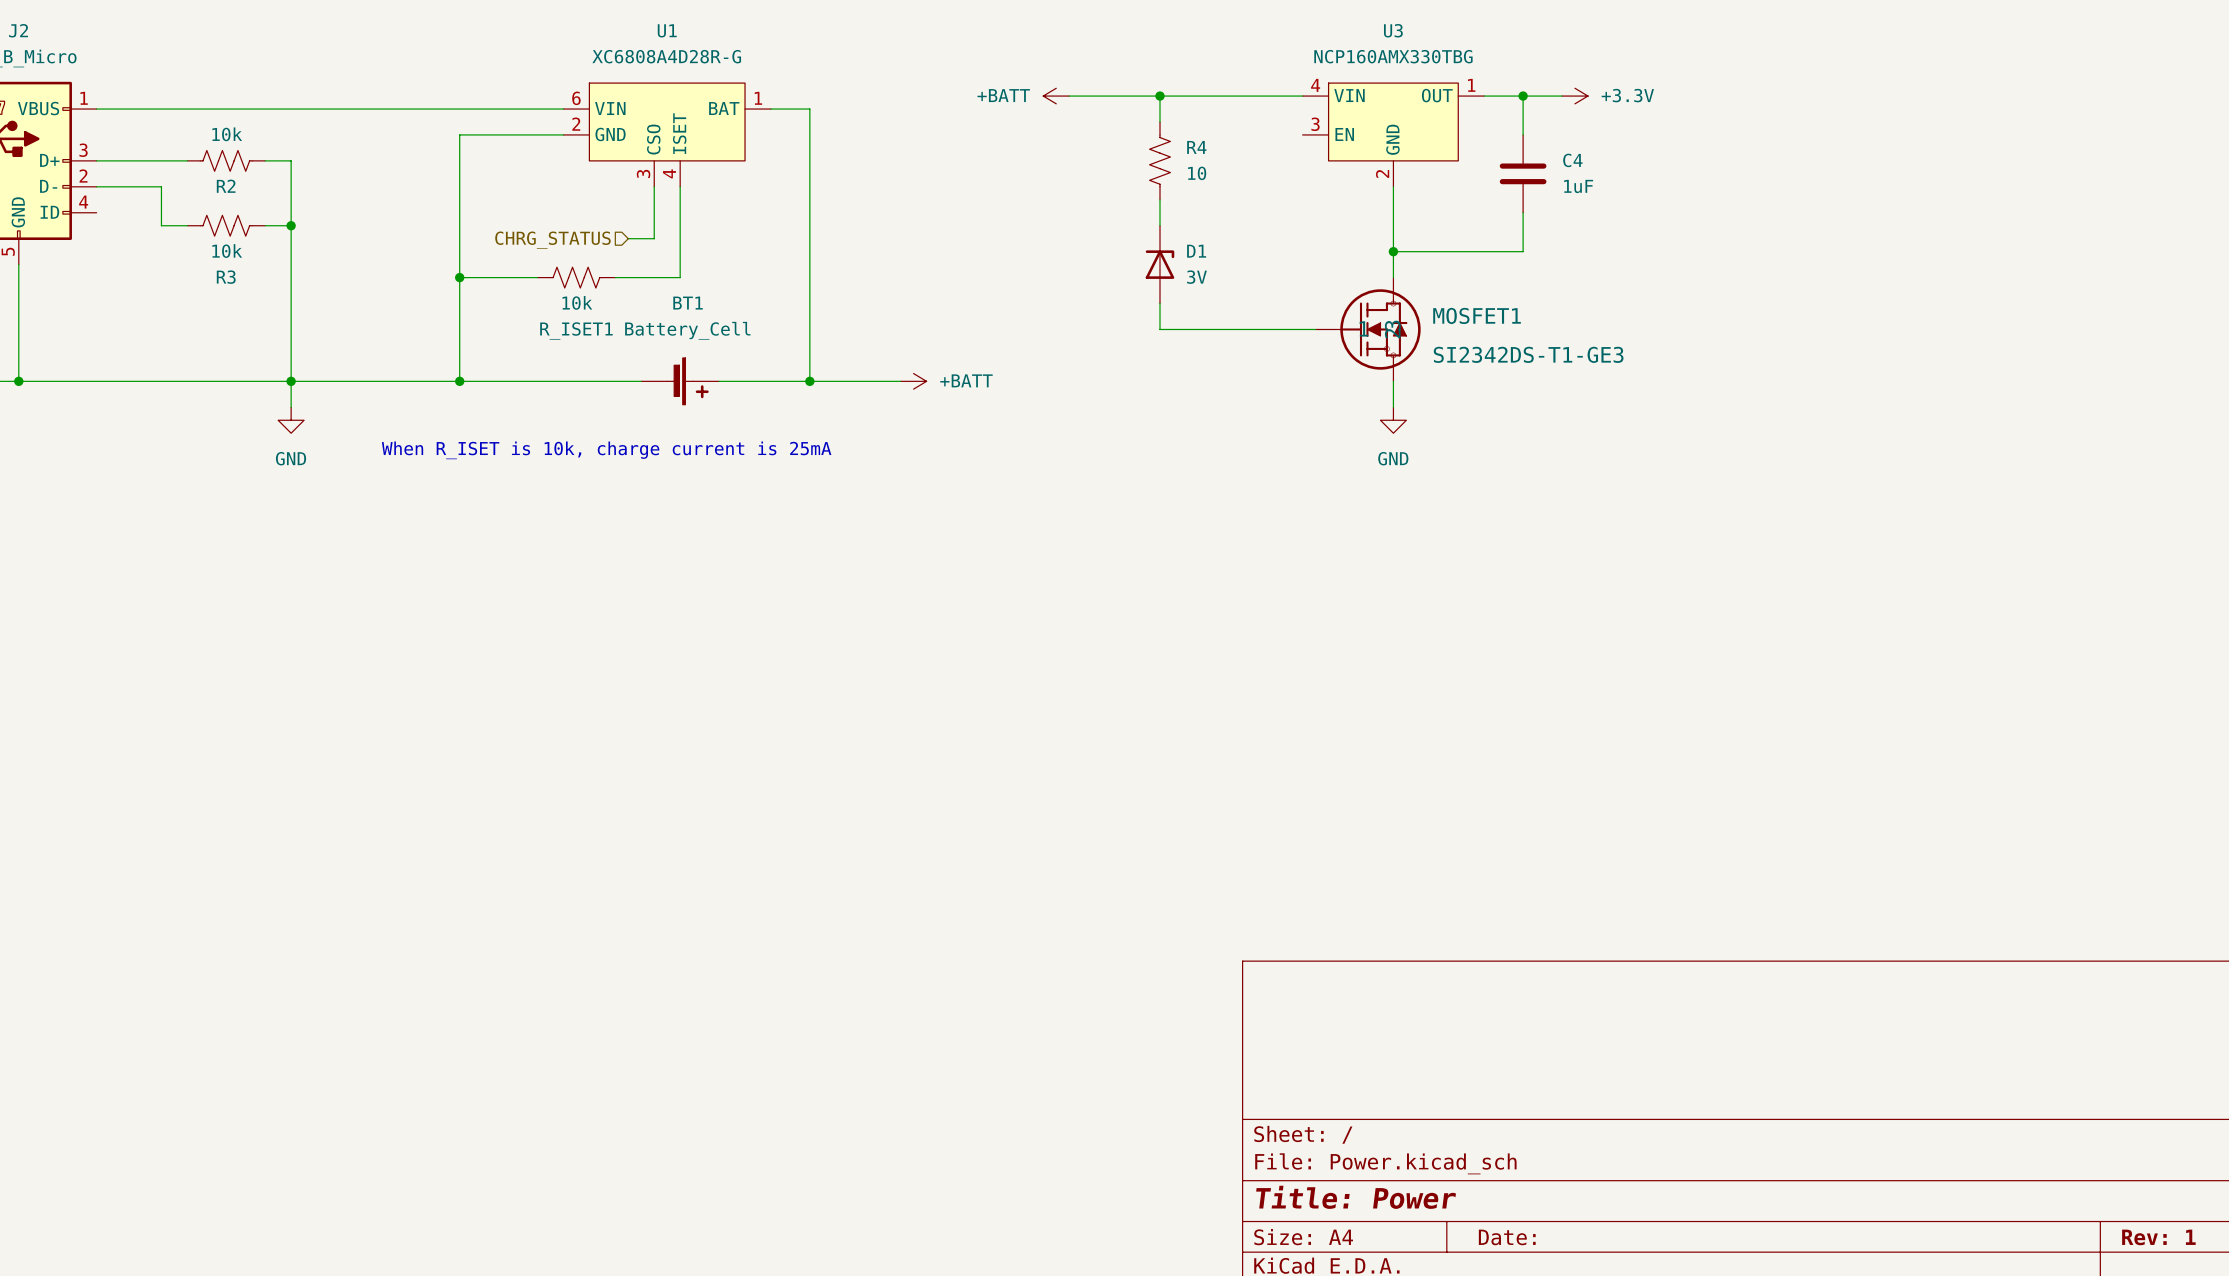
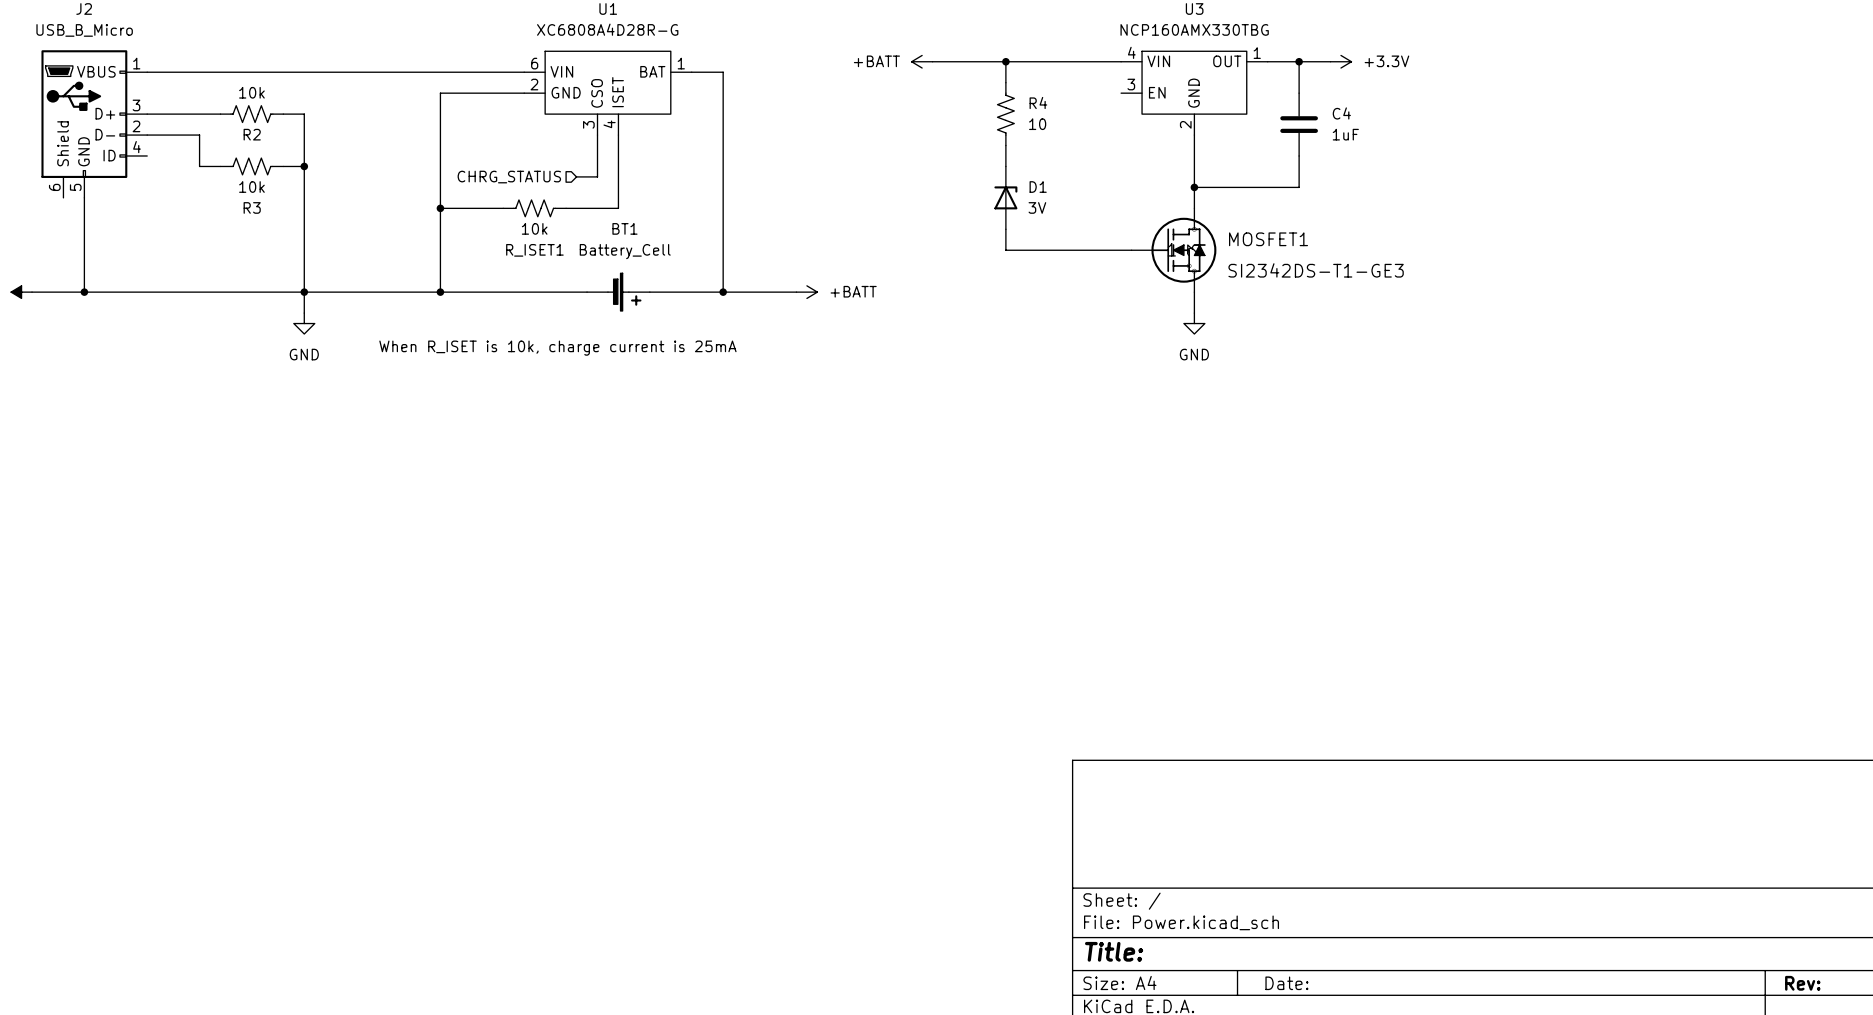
title block: Title: Power (1356, 1197) -> Title: (1114, 951)
title block: Rev: 1 (2158, 1237) -> Rev: (1802, 983)

